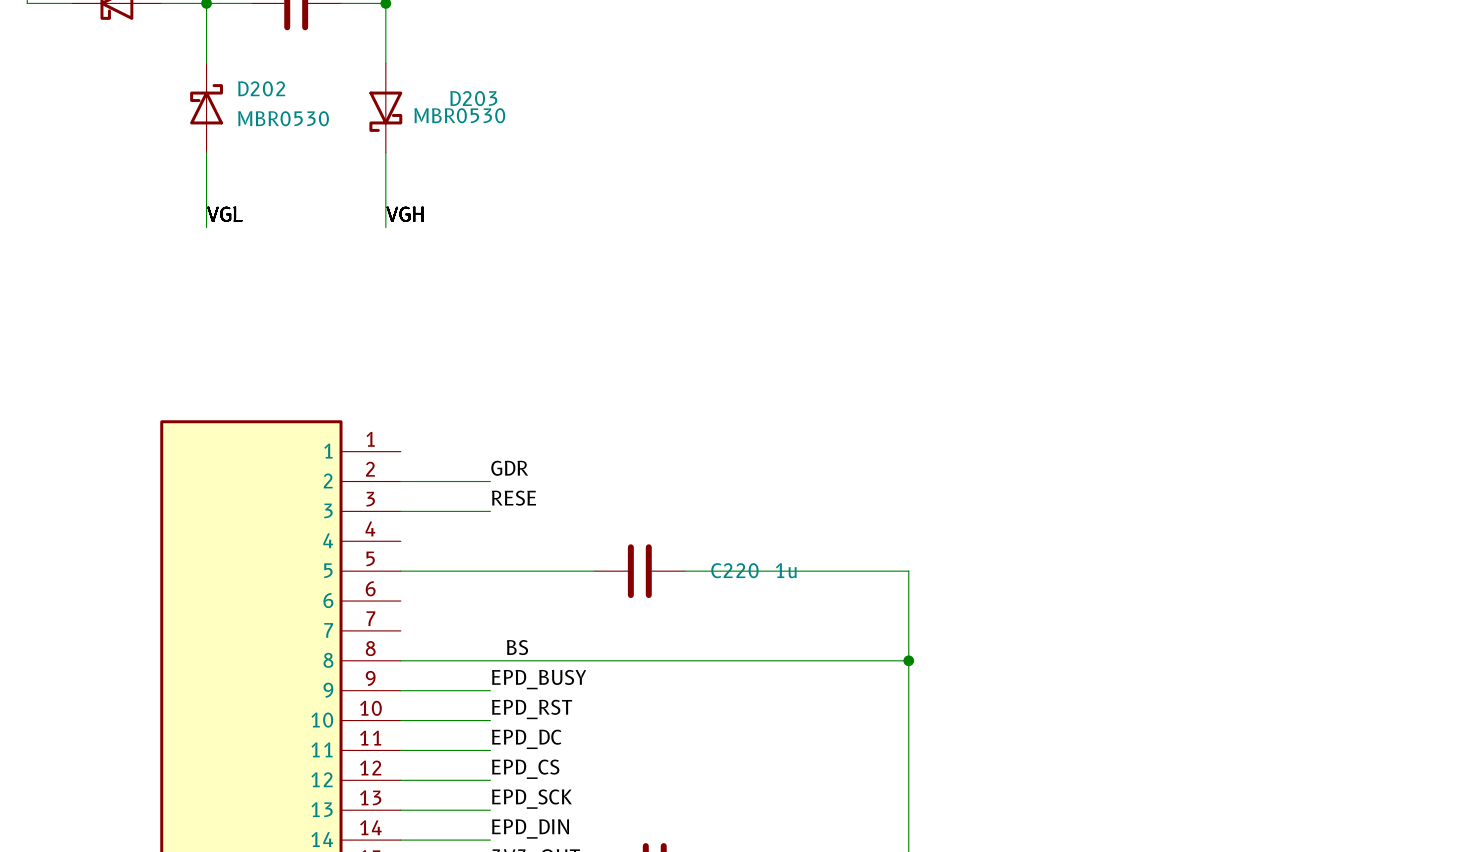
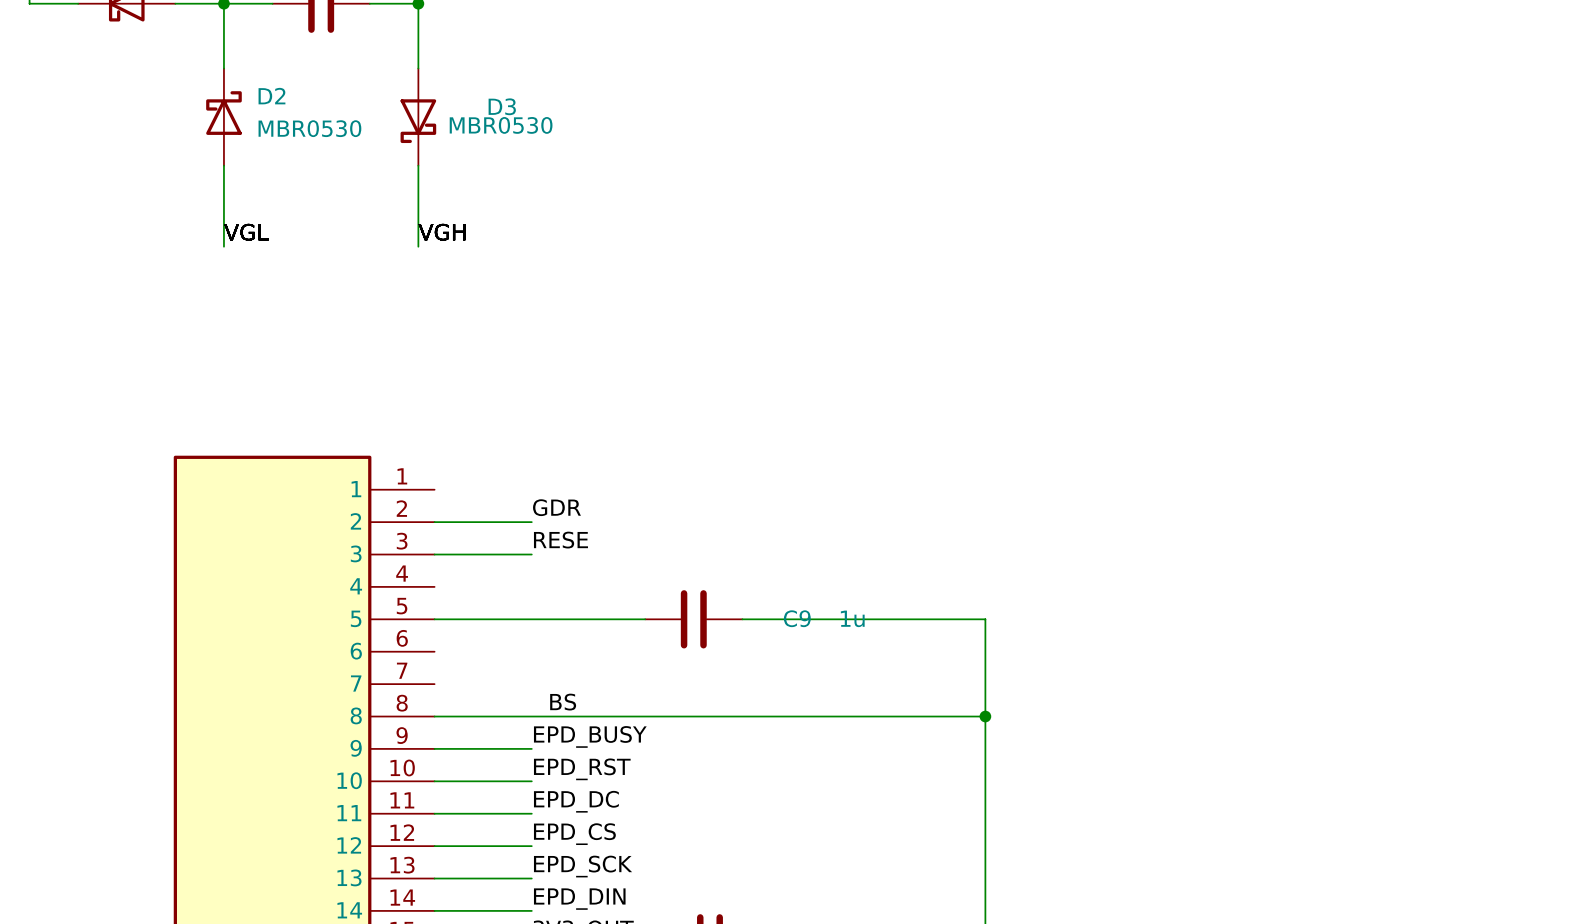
D202 name: D202 (261, 88) -> D2 (271, 96)
D203 name: D203 (473, 98) -> D3 (502, 106)
C220 name: C220 (734, 570) -> C9 (797, 618)

